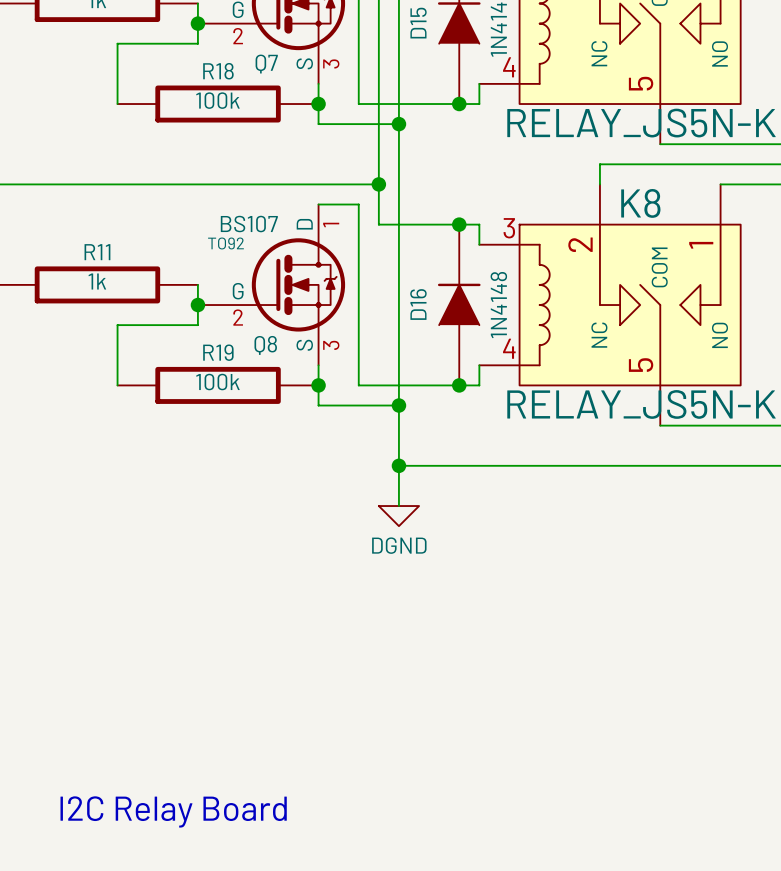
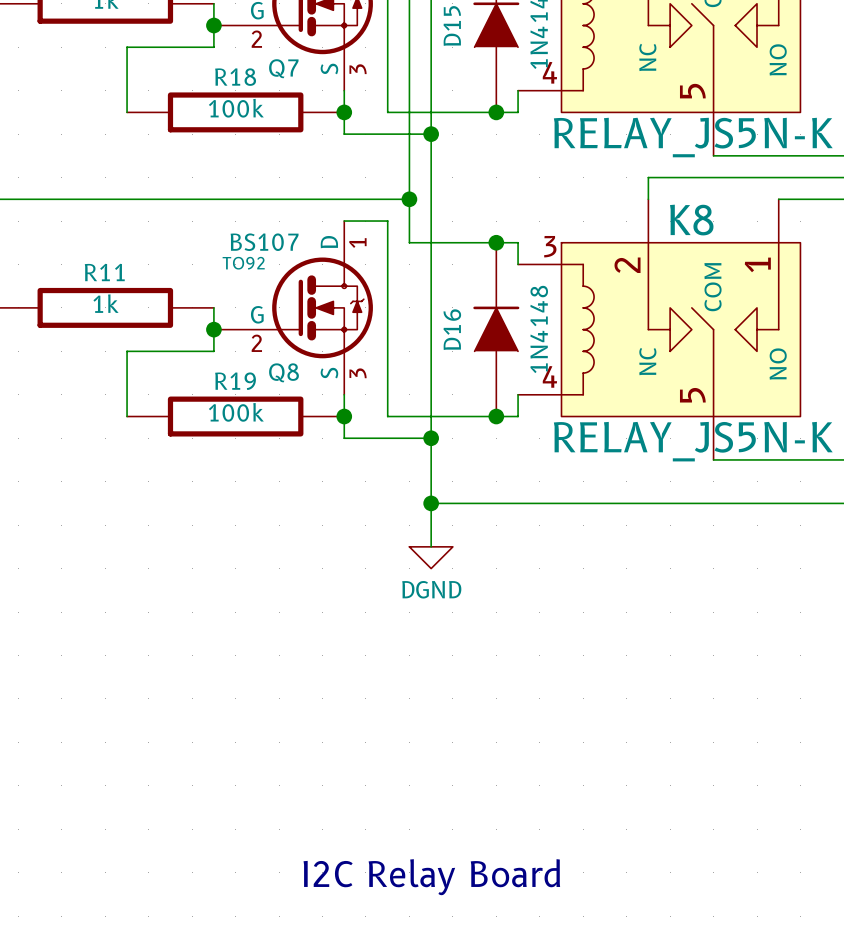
text position: I2C Relay Board (173, 811) -> I2C Relay Board (431, 877)

